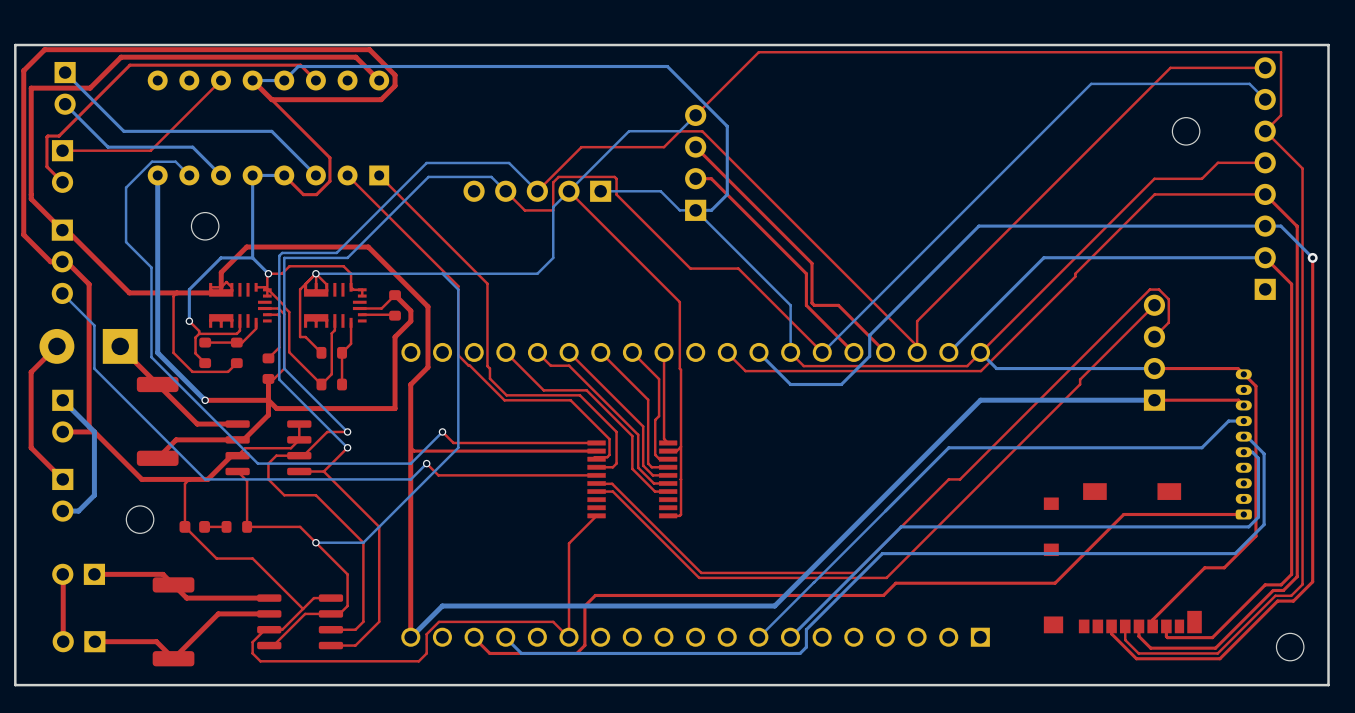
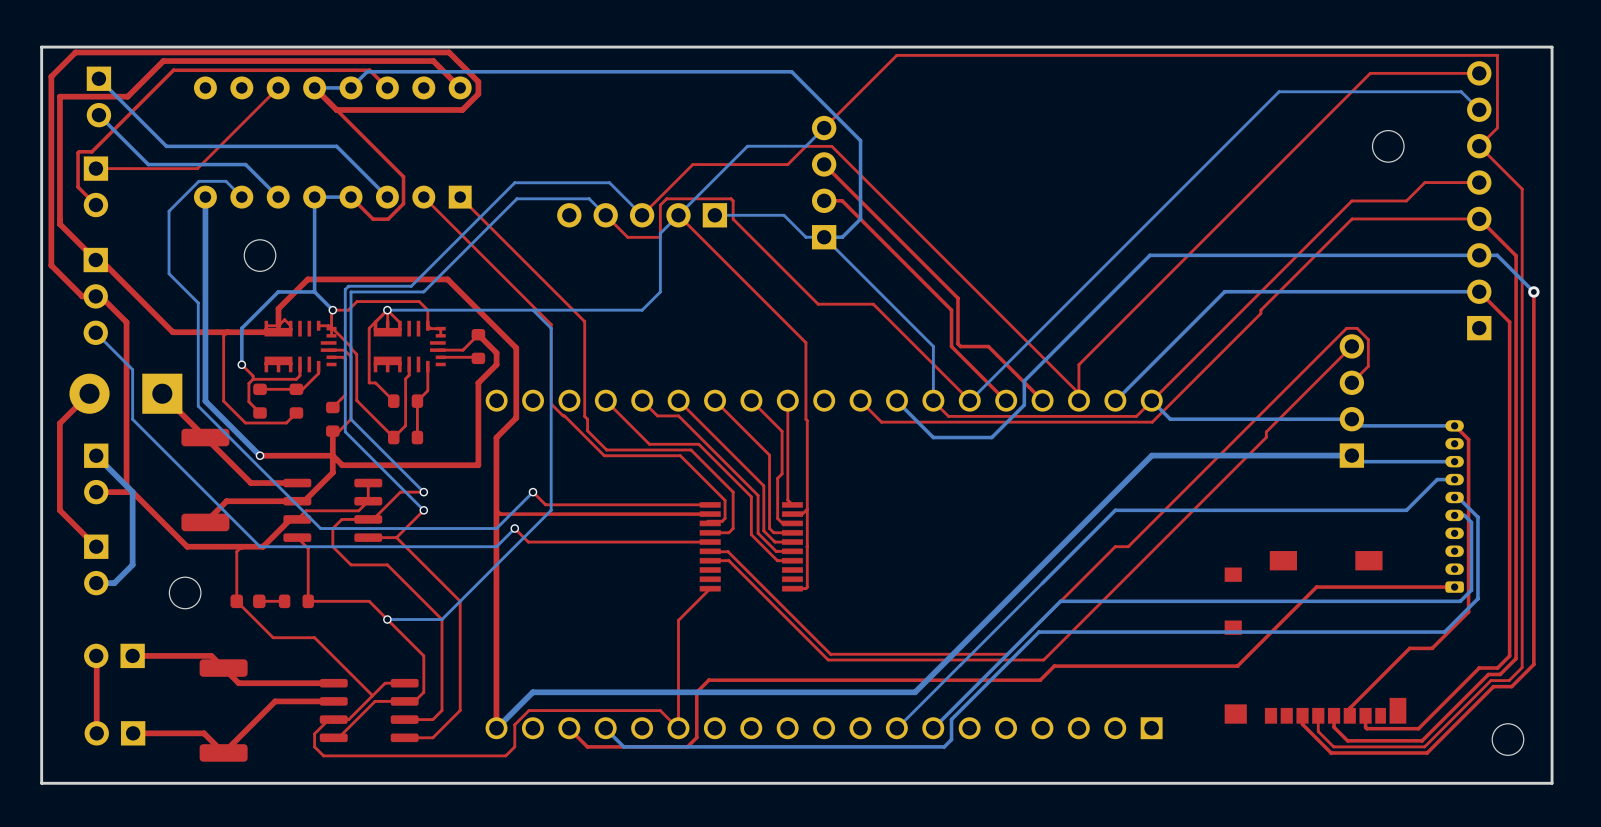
top track: (1154, 368) (1238, 368) (1243, 374) -> none
bottom track: none -> (1351, 419) (1358, 425) (1454, 425)
top track: (1154, 400) (1238, 400) (1243, 405) -> none
bottom track: none -> (1351, 455) (1357, 461) (1454, 461)

